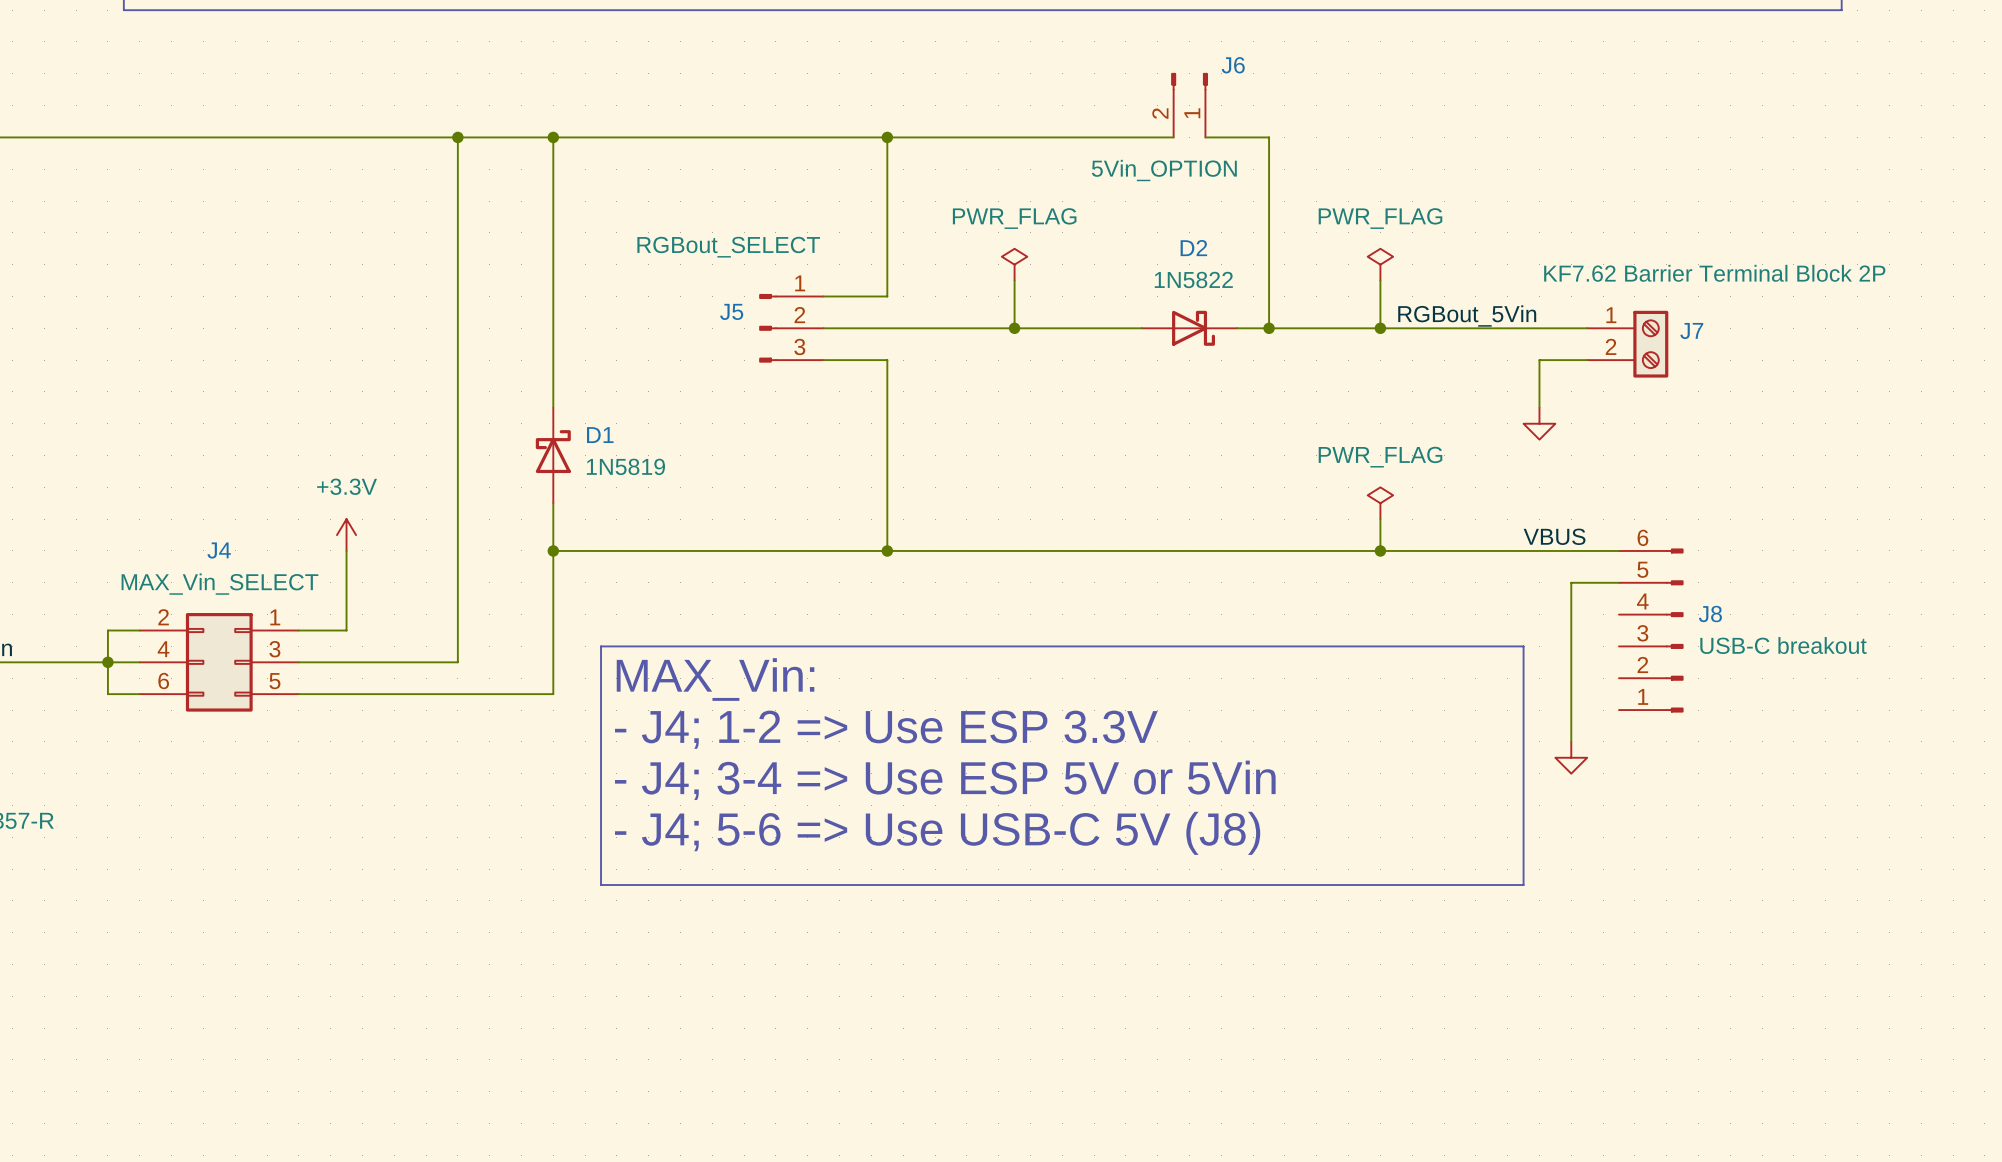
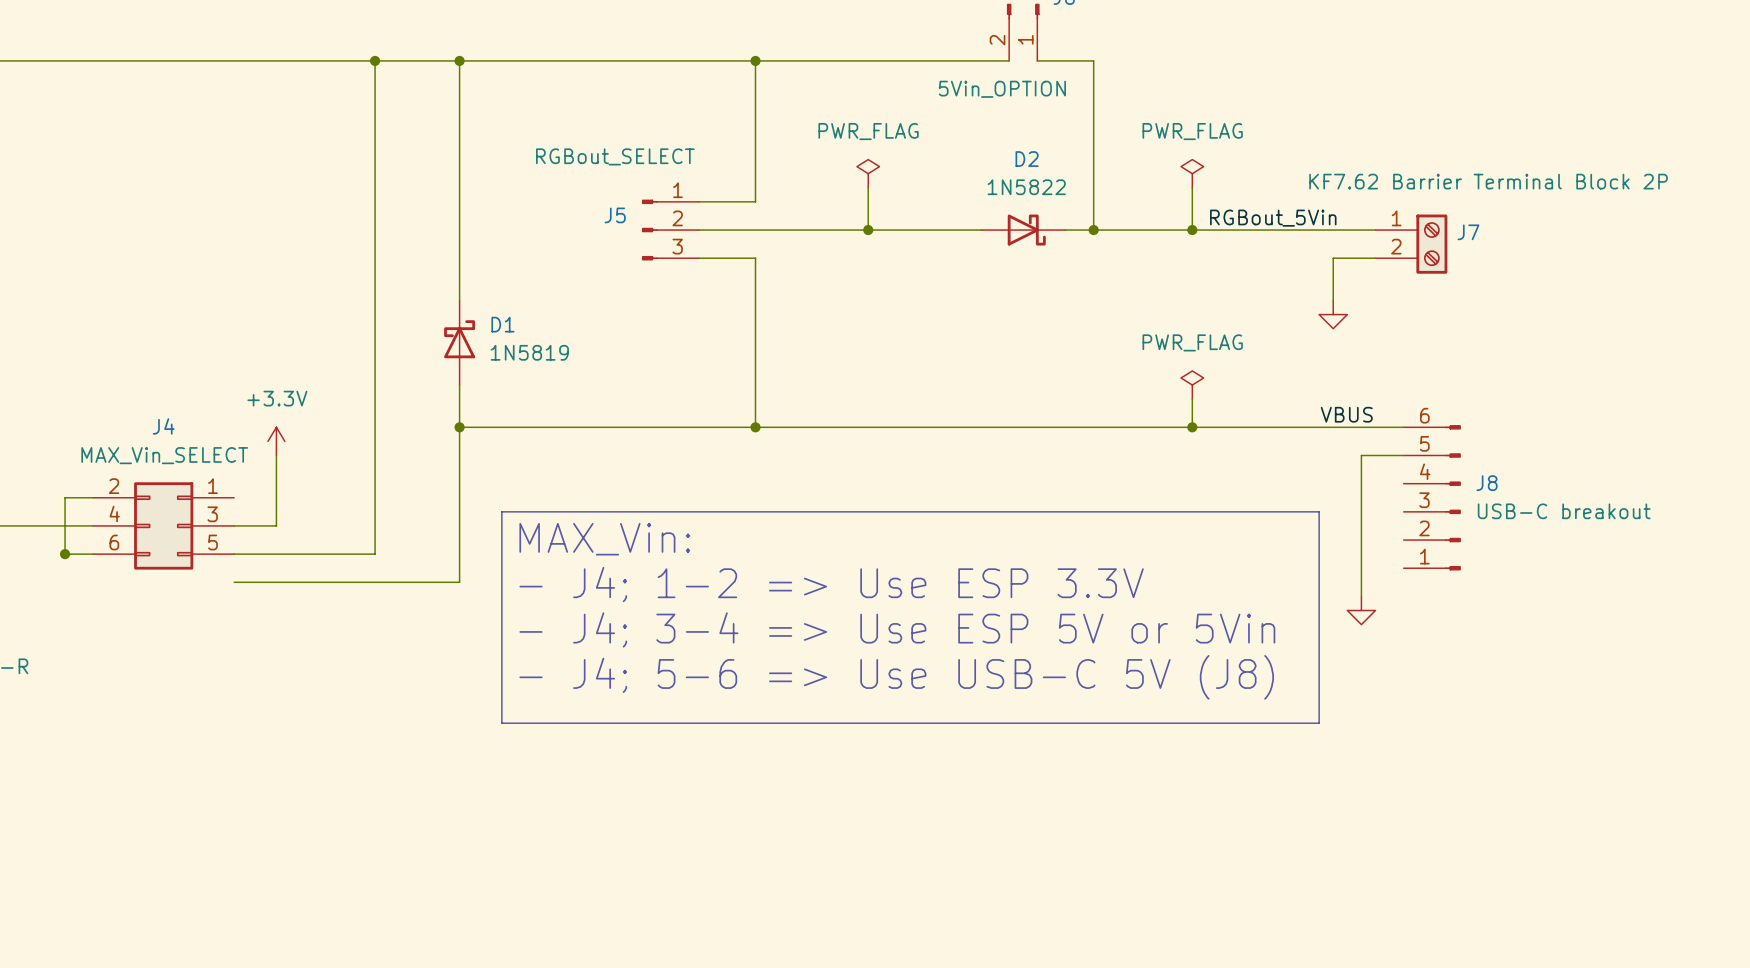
power symbol position: +3.3V (346, 535) -> +3.3V (276, 441)
wire: (298, 630) (346, 630) -> (276, 525) (276, 497)
junction position: (107, 662) -> (65, 554)
wire: (346, 662) (457, 662) -> none
wire: (457, 694) (553, 694) -> (375, 554) (375, 525)
wire: none -> (459, 554) (459, 582) (234, 582)

